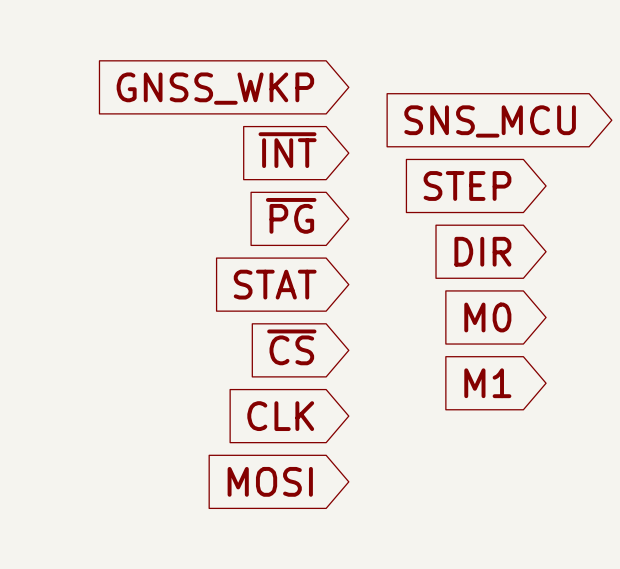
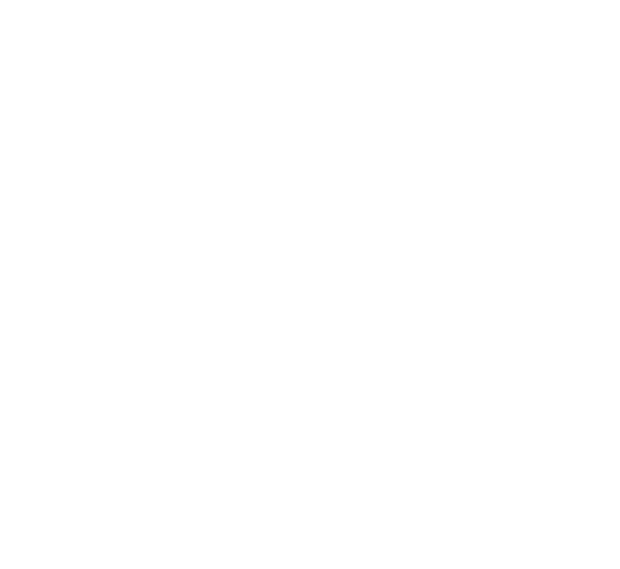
global label: GNSS_WKP (215, 88) -> none
global label: SNS_MCU (490, 121) -> none
global label: ~{INT} (287, 150) -> none
global label: STEP (467, 185) -> none
global label: ~{PG} (291, 215) -> none
global label: DIR (482, 251) -> none
global label: STAT (275, 284) -> none
global label: M0 (487, 317) -> none
global label: ~{CS} (291, 347) -> none
global label: M1 (487, 383) -> none
global label: CLK (280, 416) -> none
global label: MOSI (270, 481) -> none

